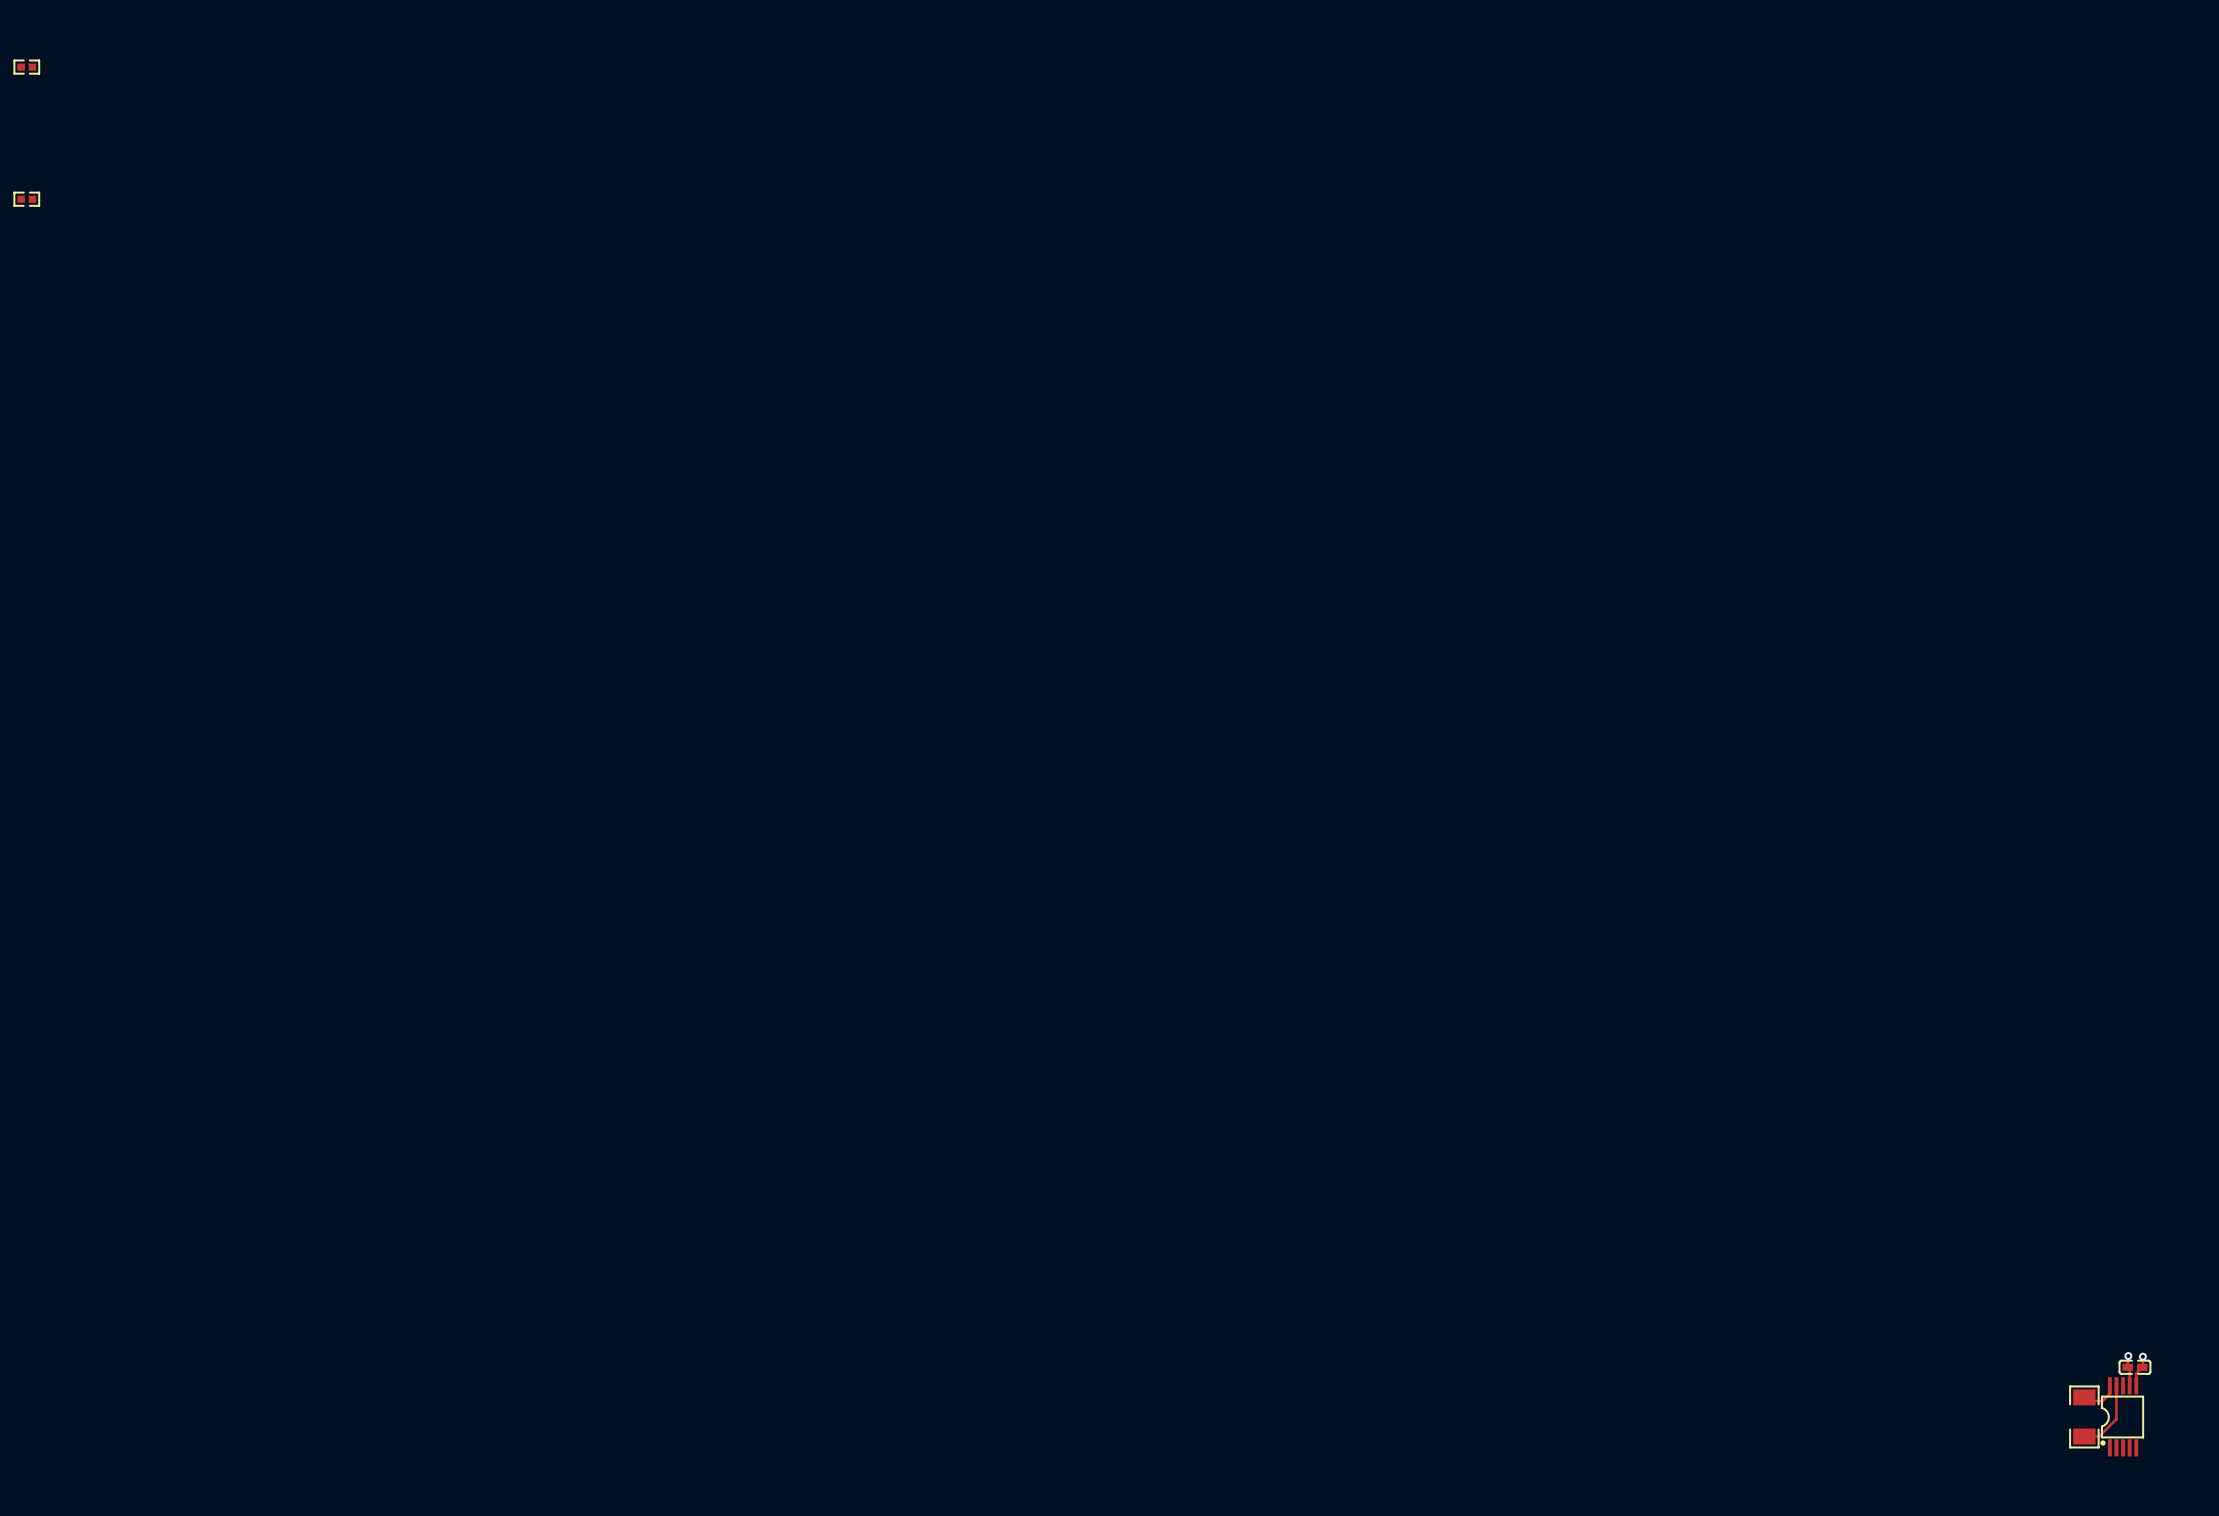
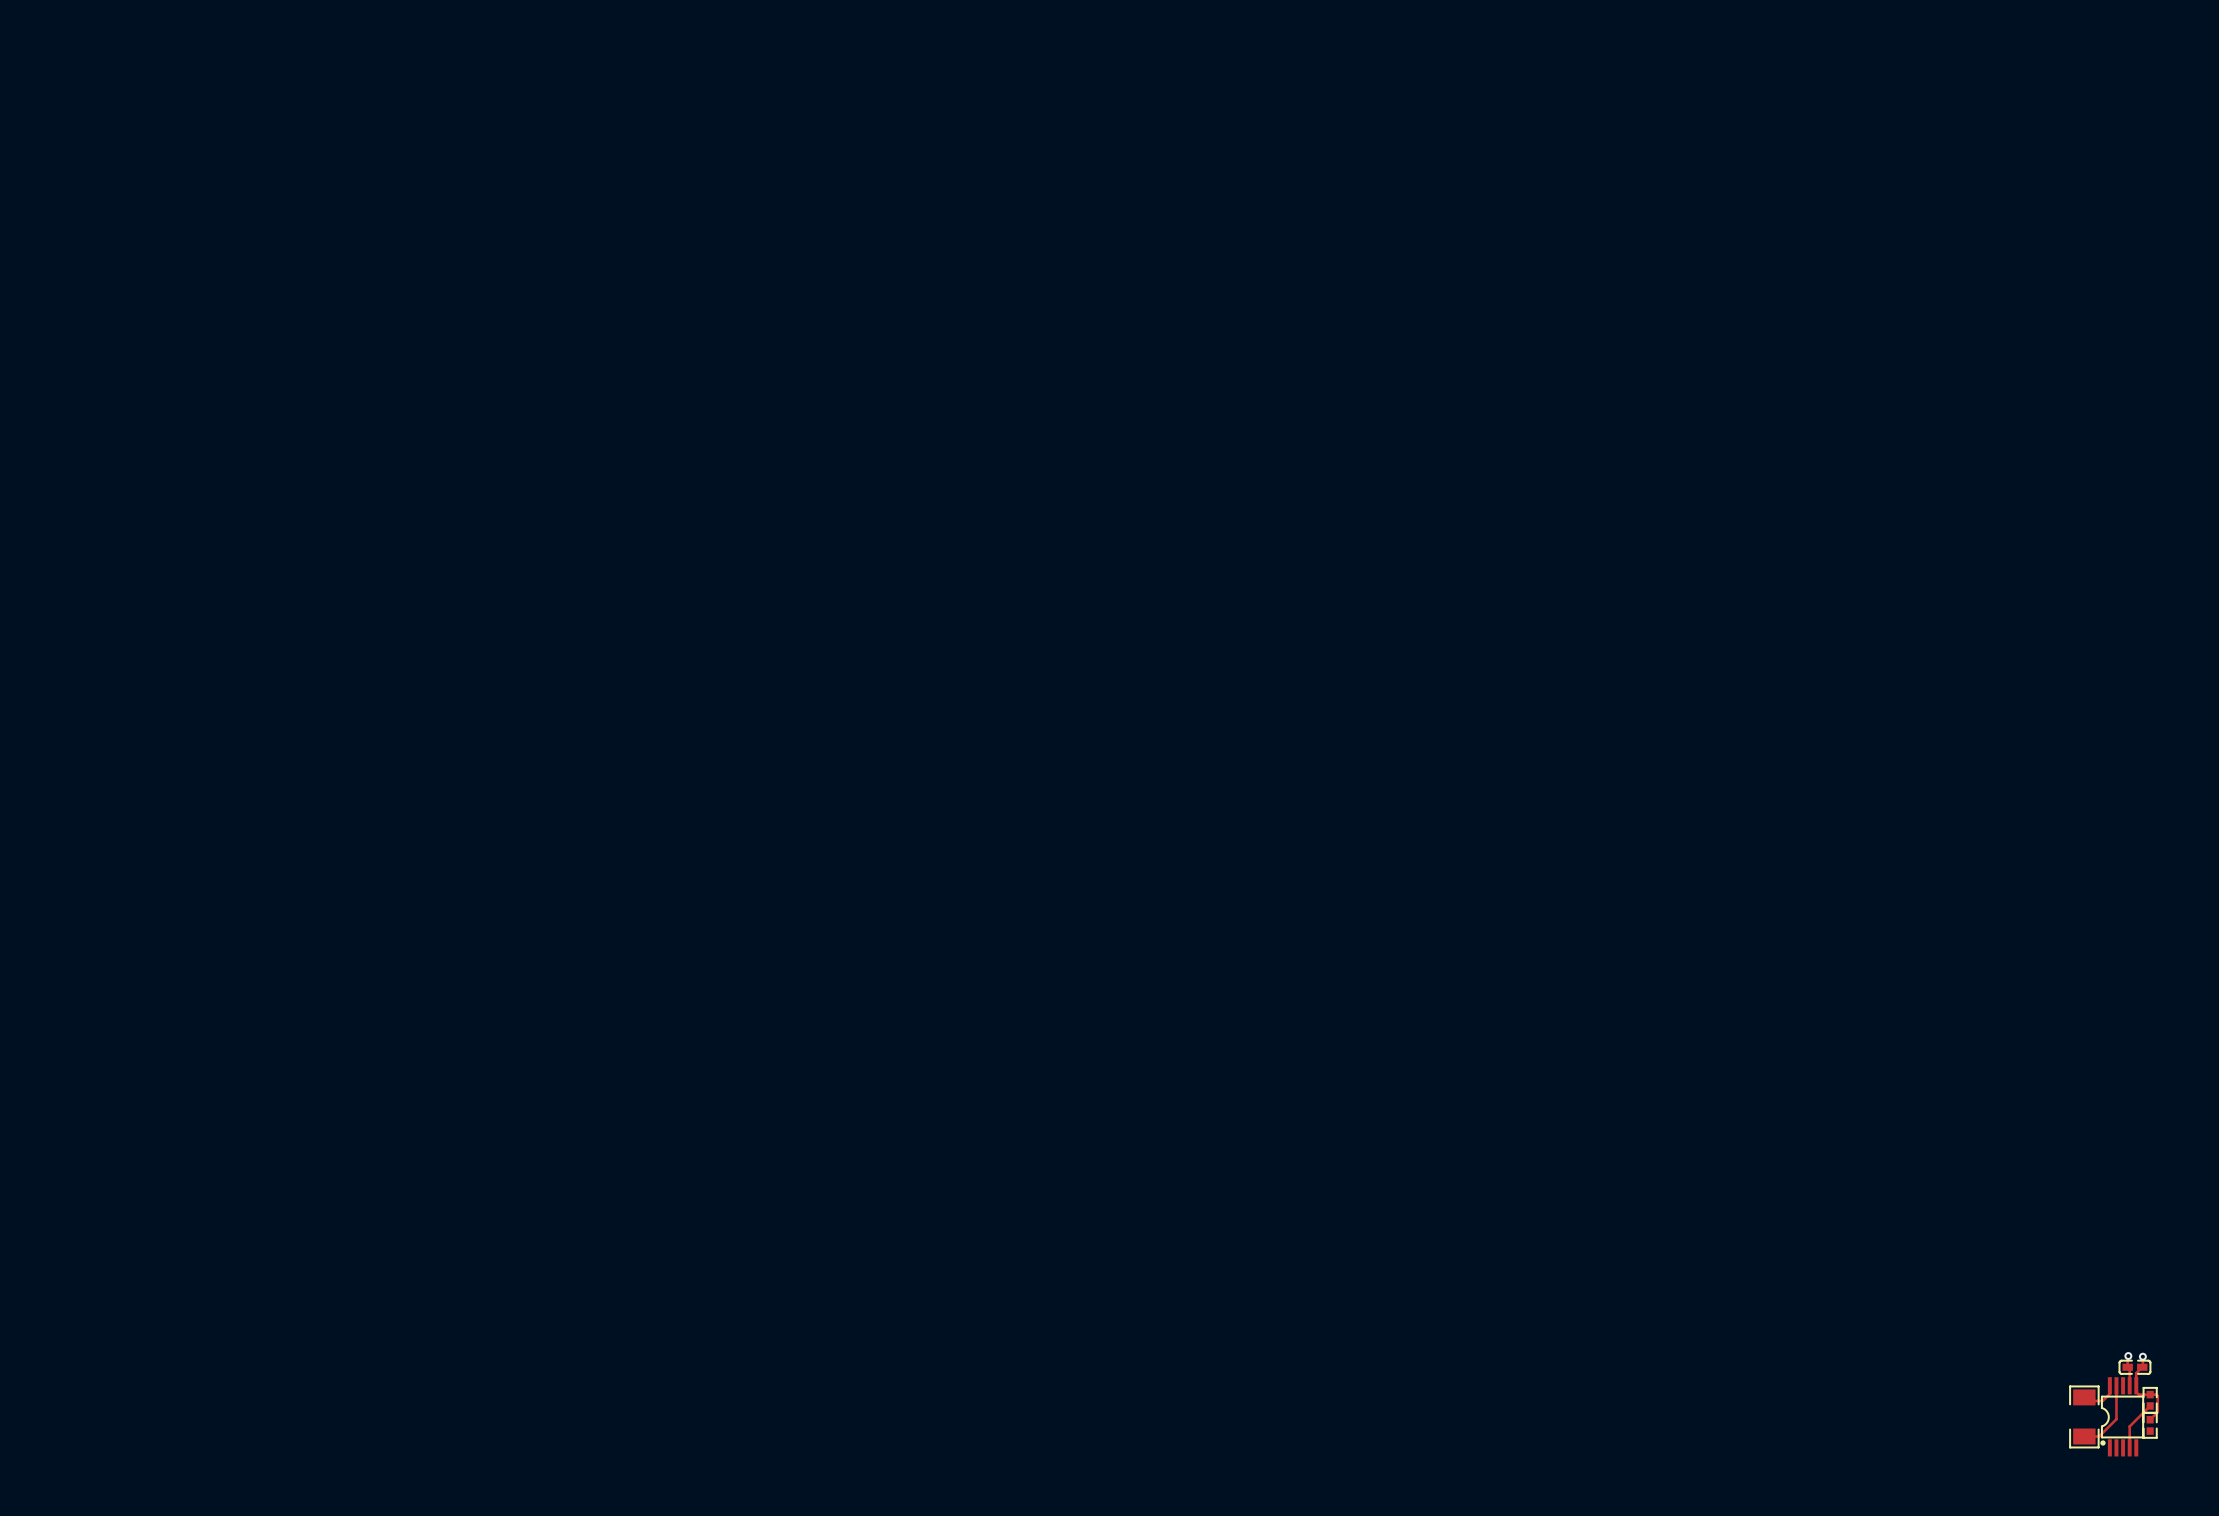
part: (26, 67) -> none
part: (26, 199) -> none
track: none -> (2136, 1385) (2136, 1392) (2138, 1394) (2157, 1395) (2157, 1412) (2150, 1419)
part: none -> (2150, 1400)
track: none -> (2150, 1405) (2129, 1426) (2129, 1447)
part: none -> (2150, 1425)

